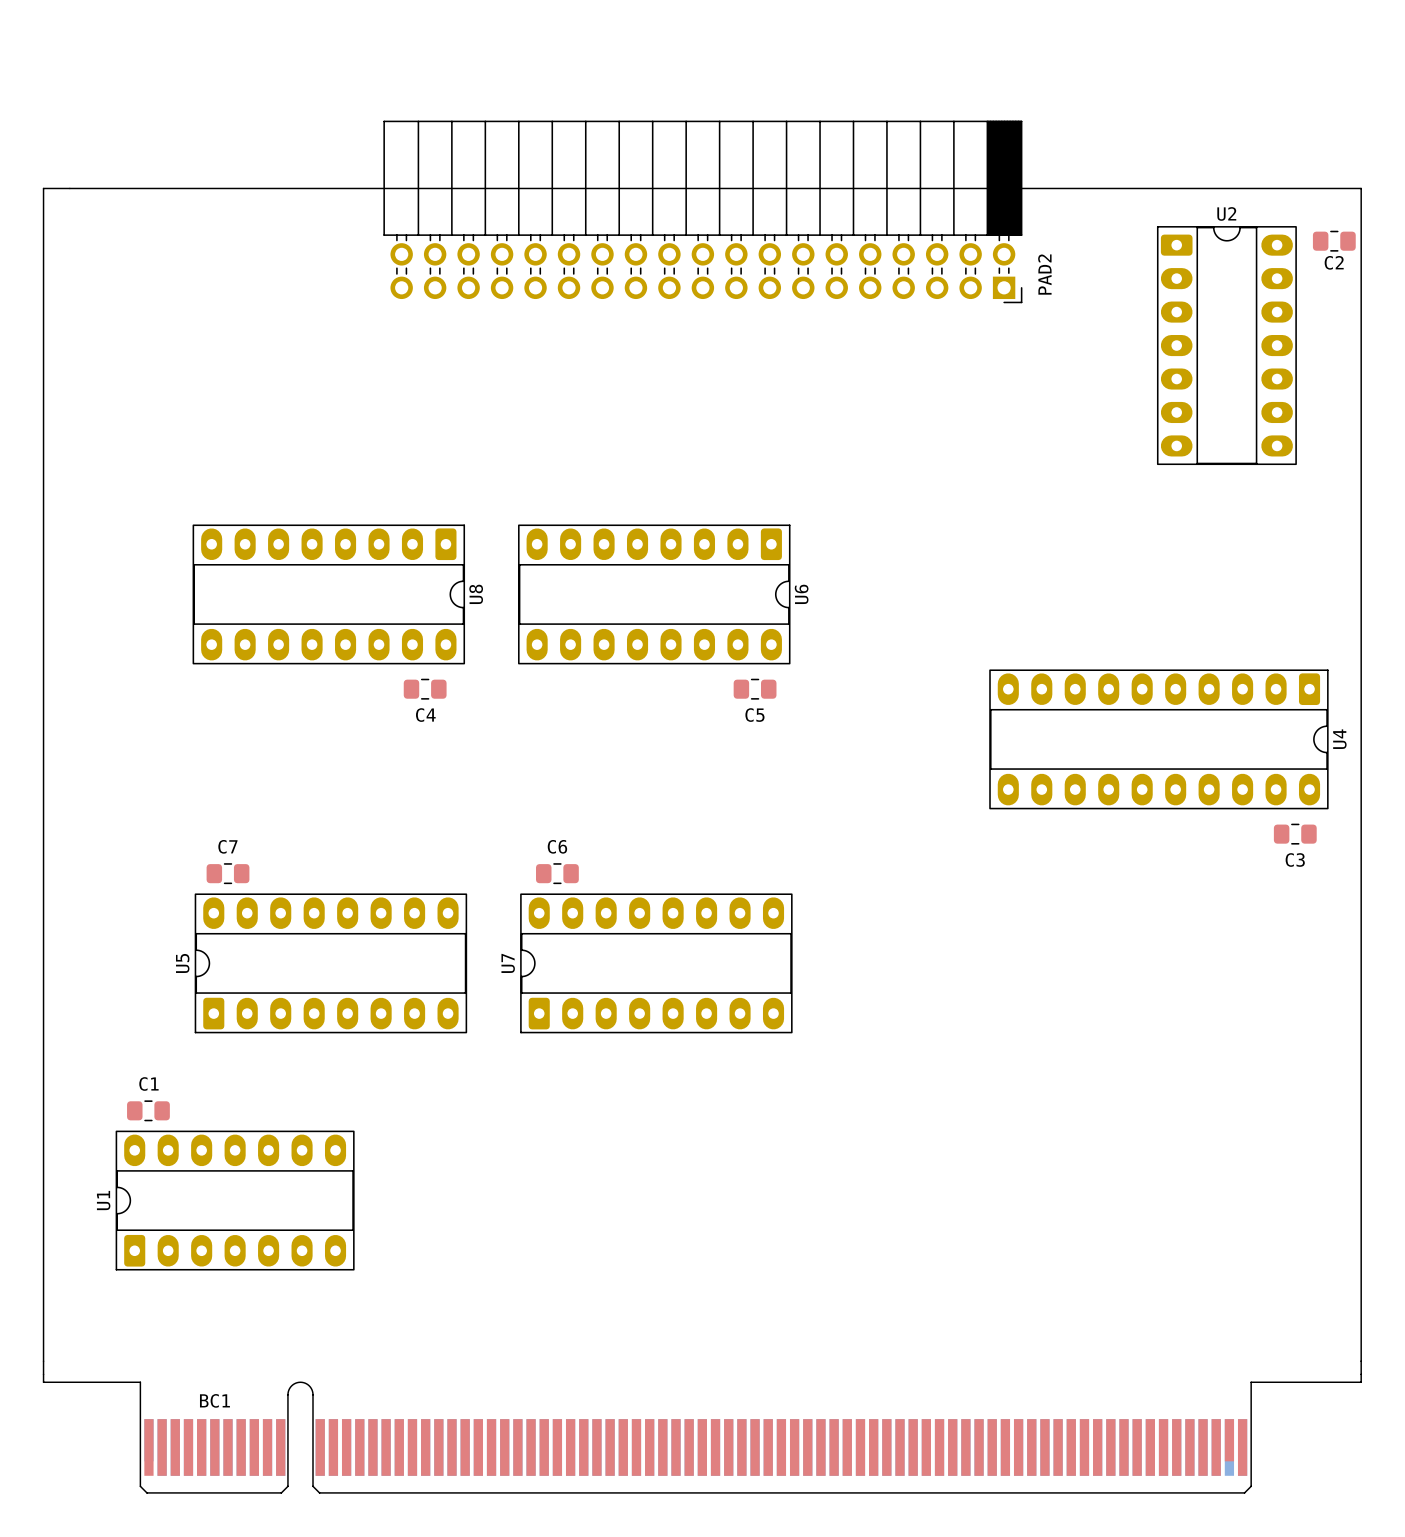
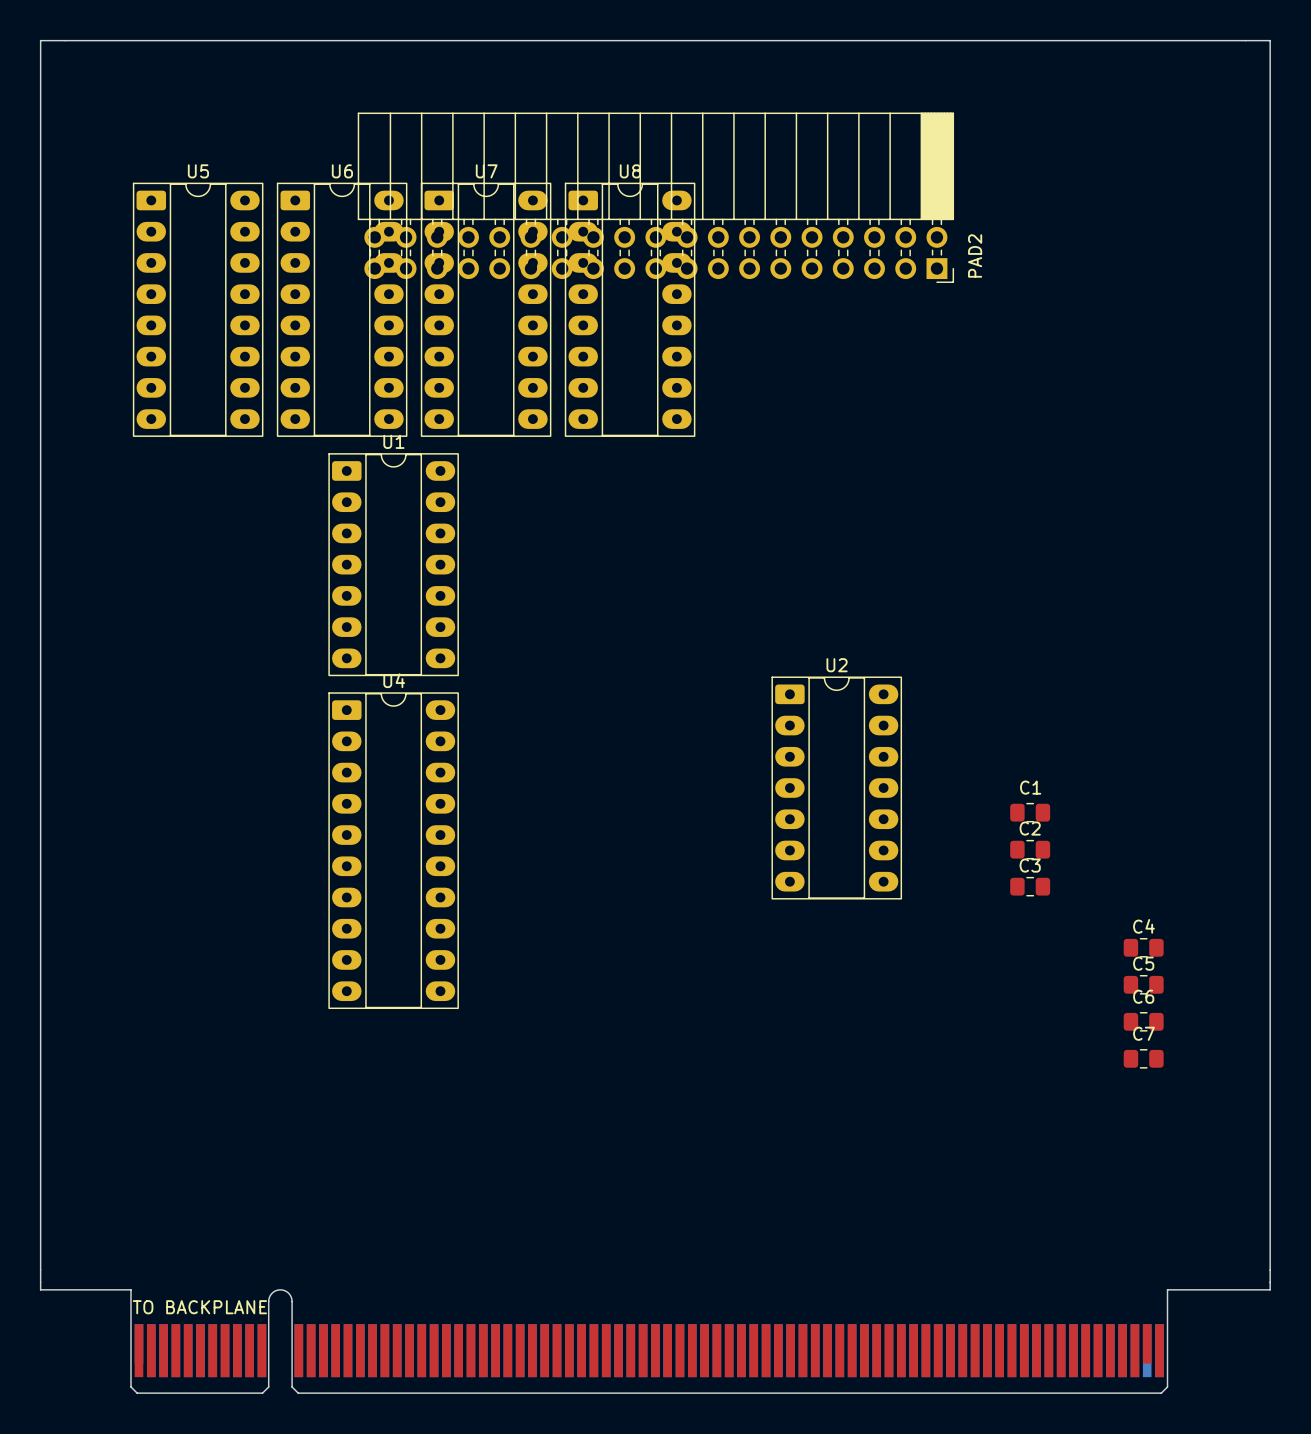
board edge: (43, 188) (1361, 188) -> (40, 175) (40, 40) (1270, 40) (1270, 175)
C2 position: (1334, 241) -> (1030, 849)
C2 name position: C2 (1334, 262) -> C2 (1030, 828)
U2 position: (1226, 345) -> (836, 788)
U8 rotation: 0° (328, 594) -> 90° counterclockwise (630, 309)
U8 position: (328, 594) -> (630, 309)
U6 rotation: 0° (654, 594) -> 90° counterclockwise (342, 309)
U6 position: (654, 594) -> (342, 309)
C4 position: (425, 689) -> (1143, 947)
C5 position: (755, 689) -> (1143, 984)
C4 name position: C4 (425, 715) -> C4 (1143, 926)
C5 name position: C5 (754, 715) -> C5 (1143, 963)
U4 rotation: 0° (1158, 739) -> 90° counterclockwise (393, 850)
U4 position: (1158, 739) -> (393, 850)
C3 position: (1295, 834) -> (1030, 886)
C3 name position: C3 (1295, 859) -> C3 (1030, 865)
C7 position: (228, 873) -> (1143, 1058)
C6 position: (557, 873) -> (1143, 1021)
U5 rotation: 0° (330, 963) -> 90° clockwise (198, 309)
U5 position: (330, 963) -> (198, 309)
U7 rotation: 0° (656, 963) -> 90° clockwise (486, 309)
U7 position: (656, 963) -> (486, 309)
C1 position: (148, 1110) -> (1030, 812)
U1 rotation: 0° (235, 1200) -> 90° clockwise (393, 564)
U1 position: (235, 1200) -> (393, 564)
BC1 name: BC1 (214, 1400) -> TO BACKPLANE (199, 1307)

